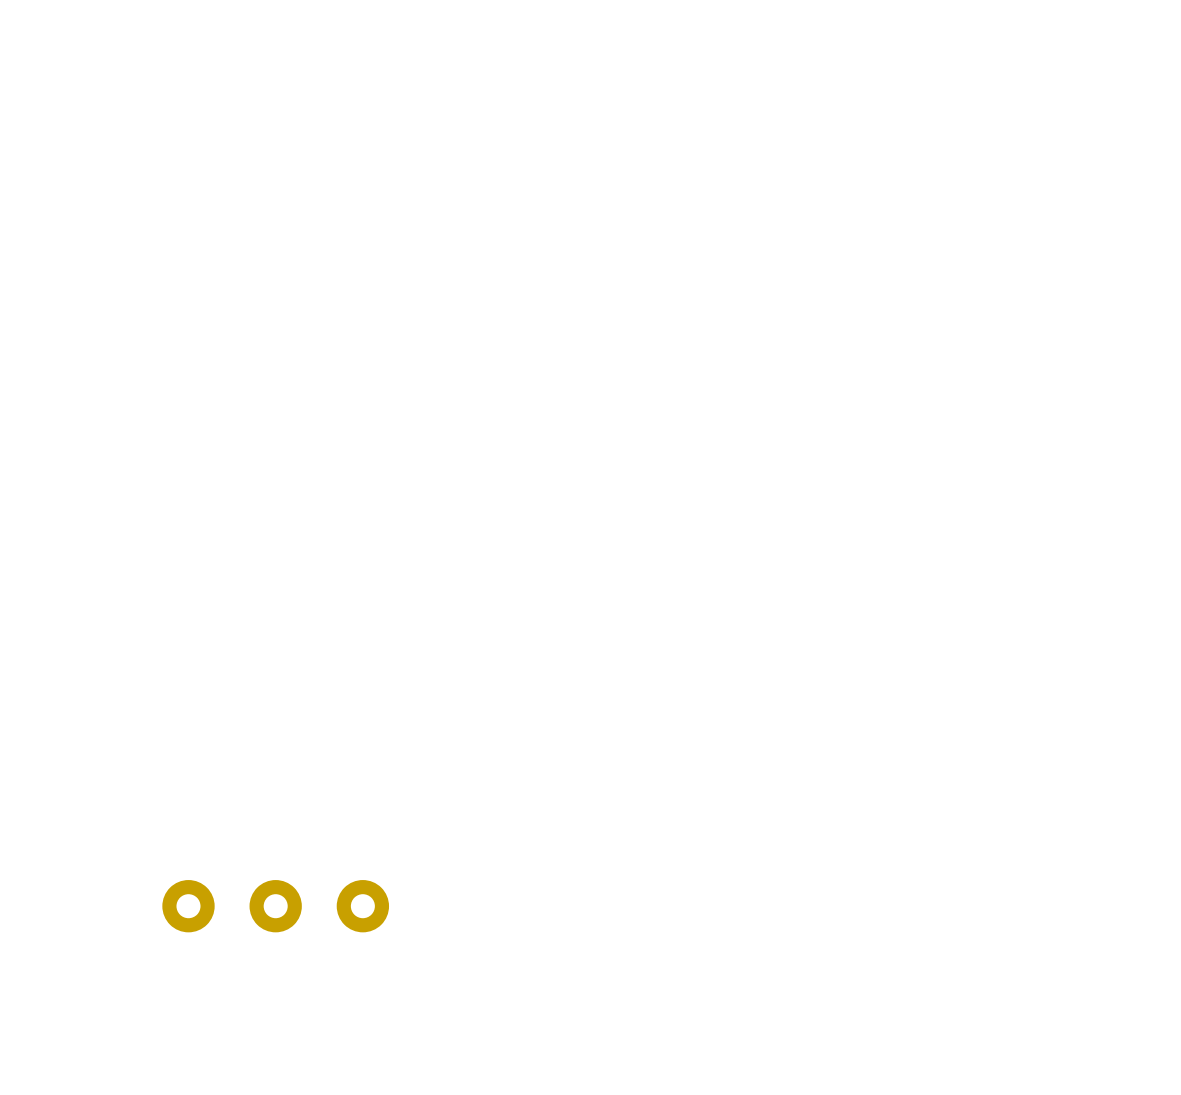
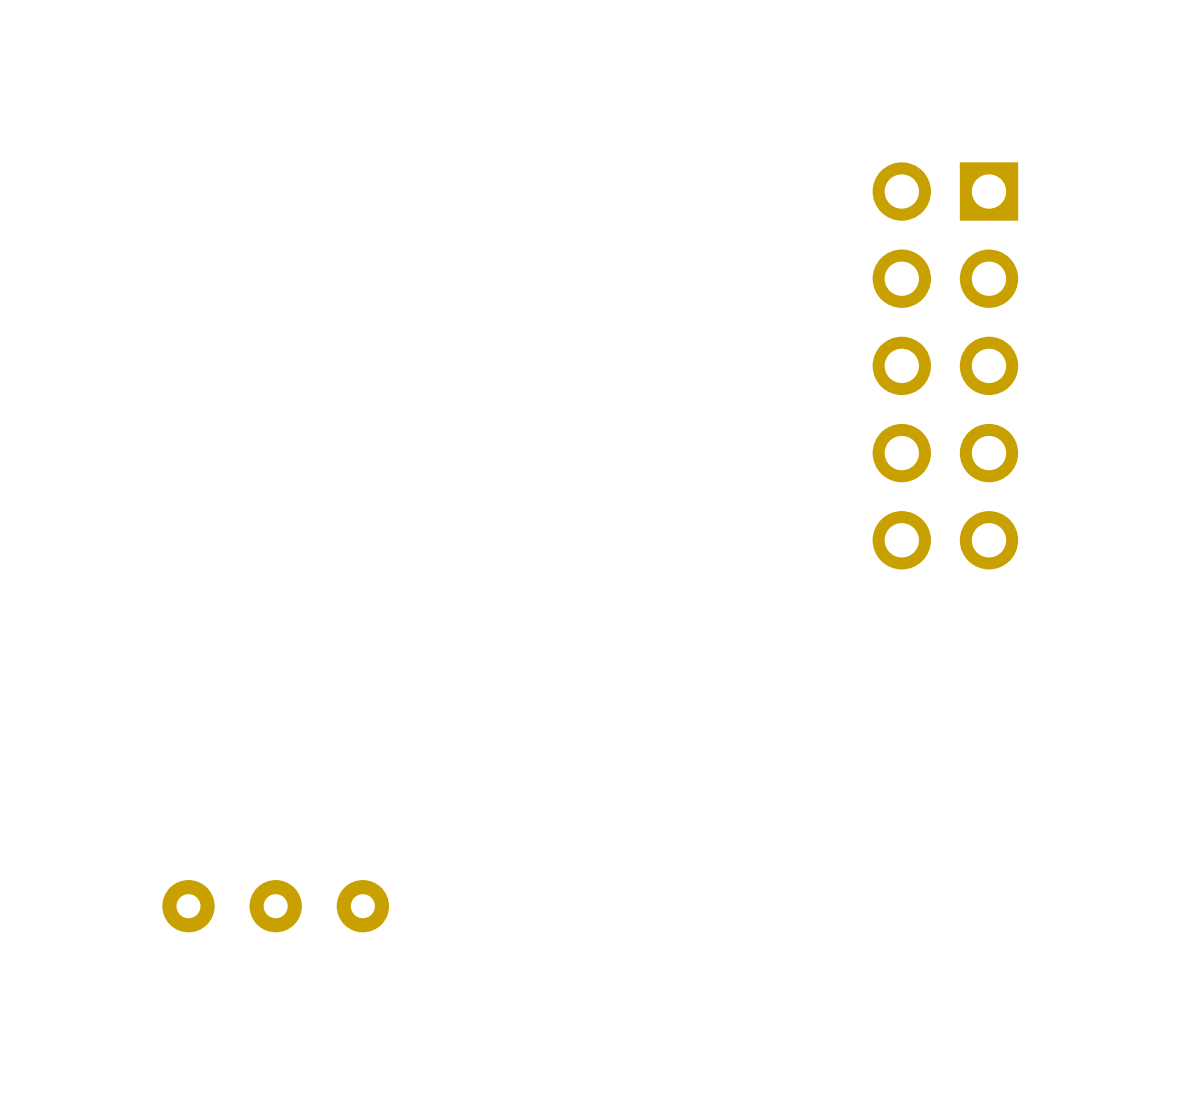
part: none -> (945, 365)

